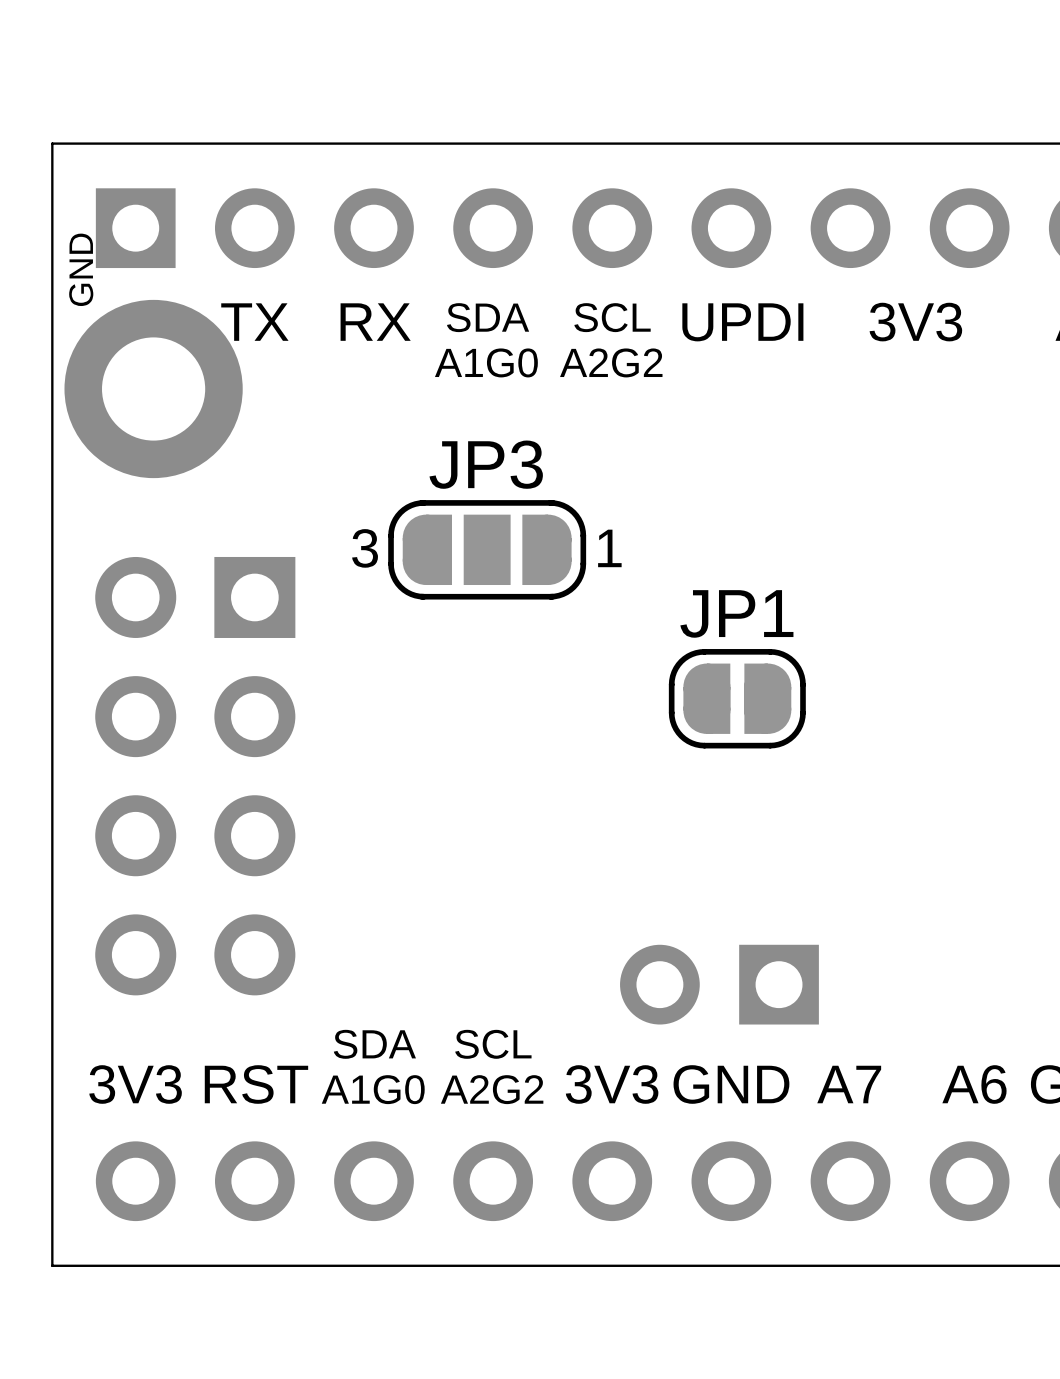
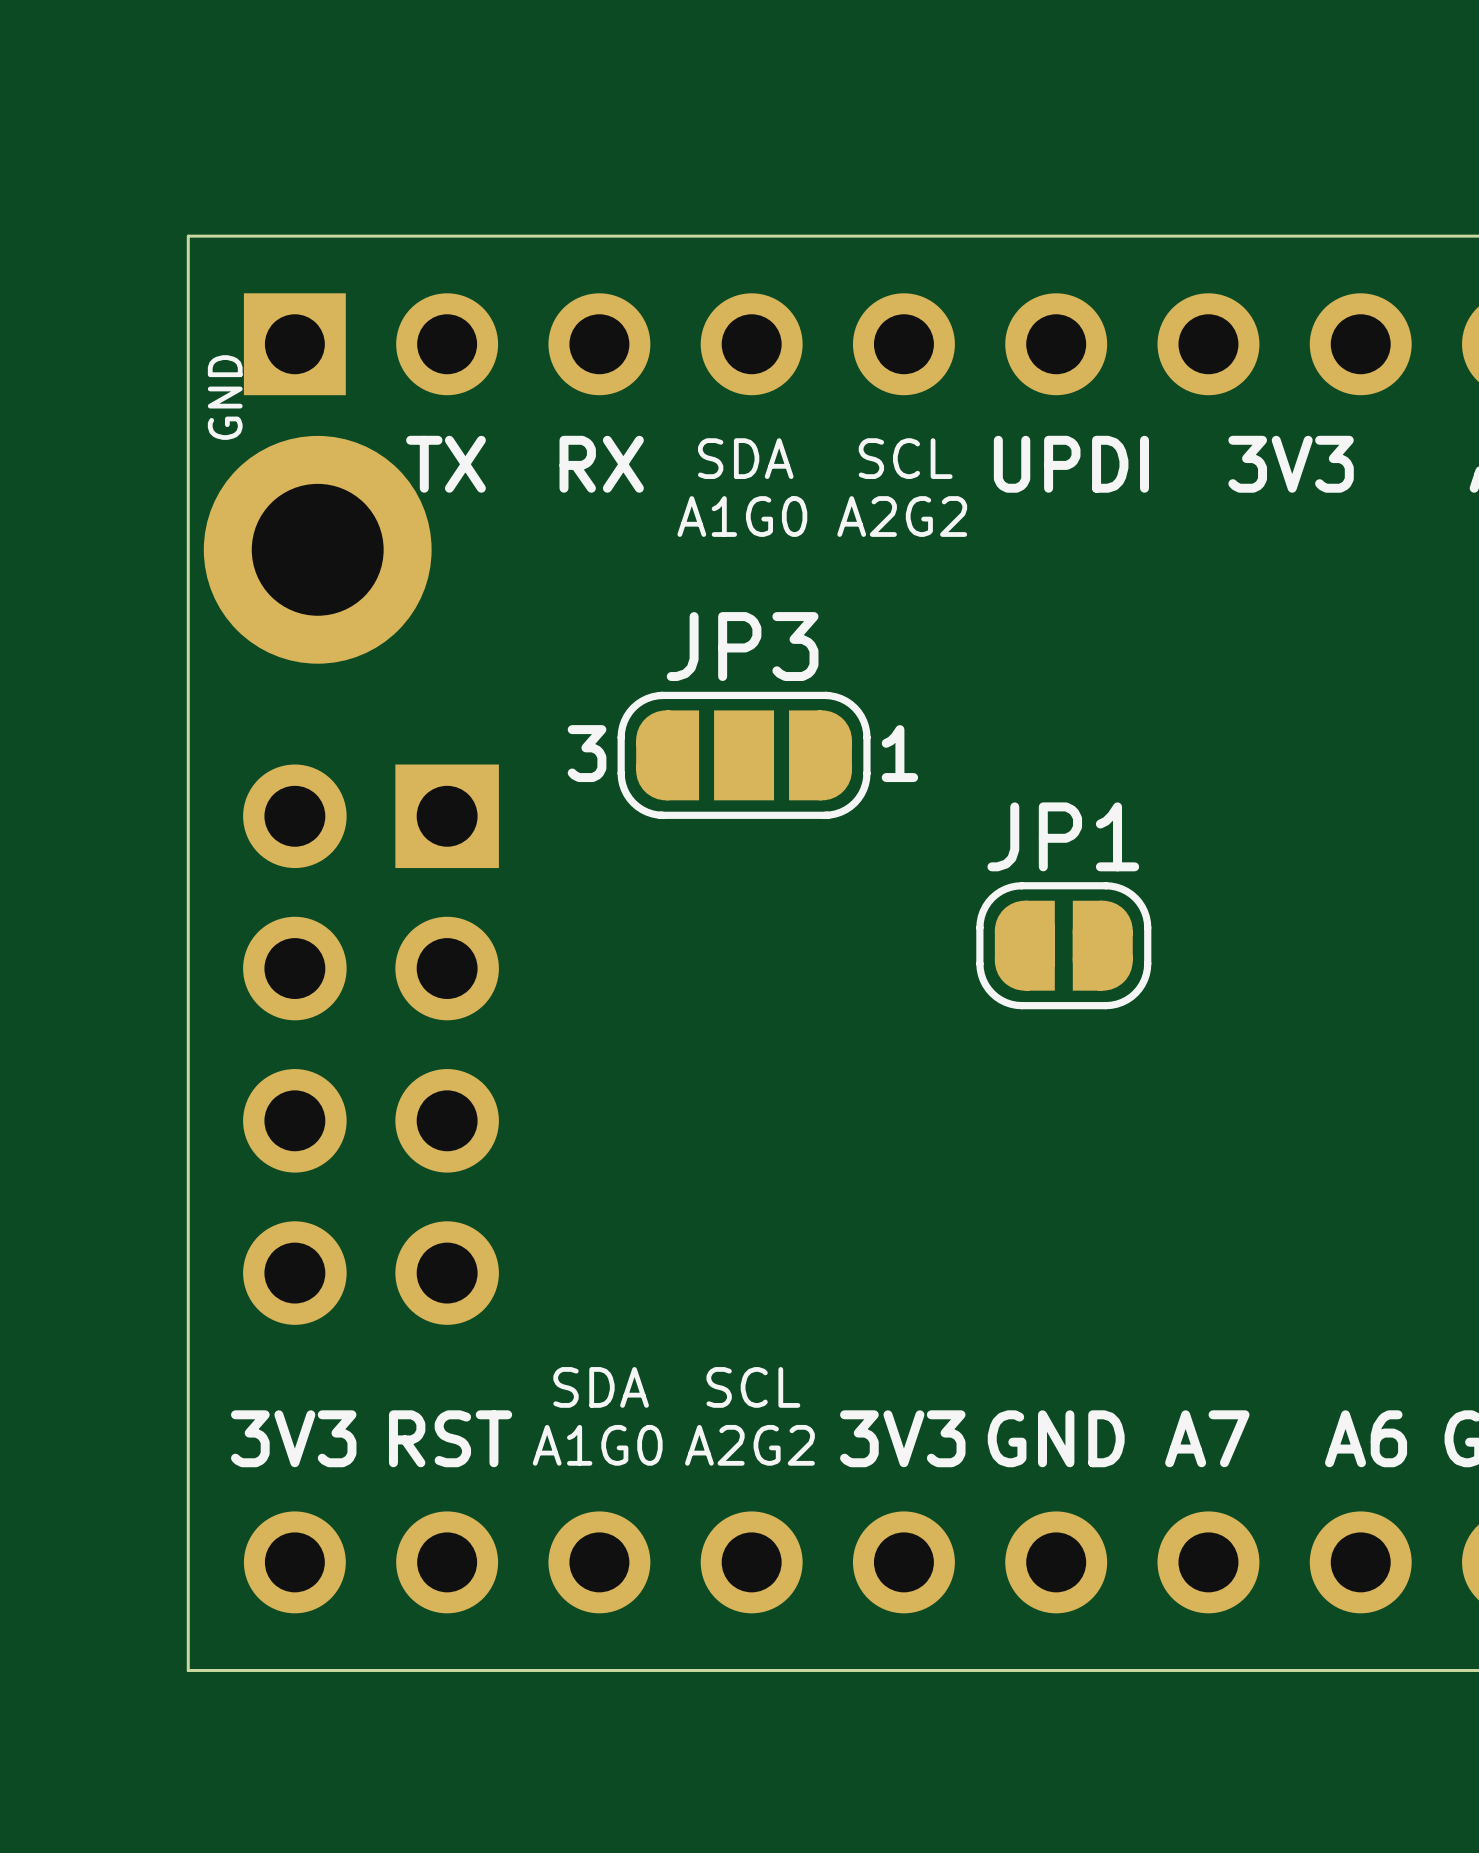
part: (719, 984) -> none

